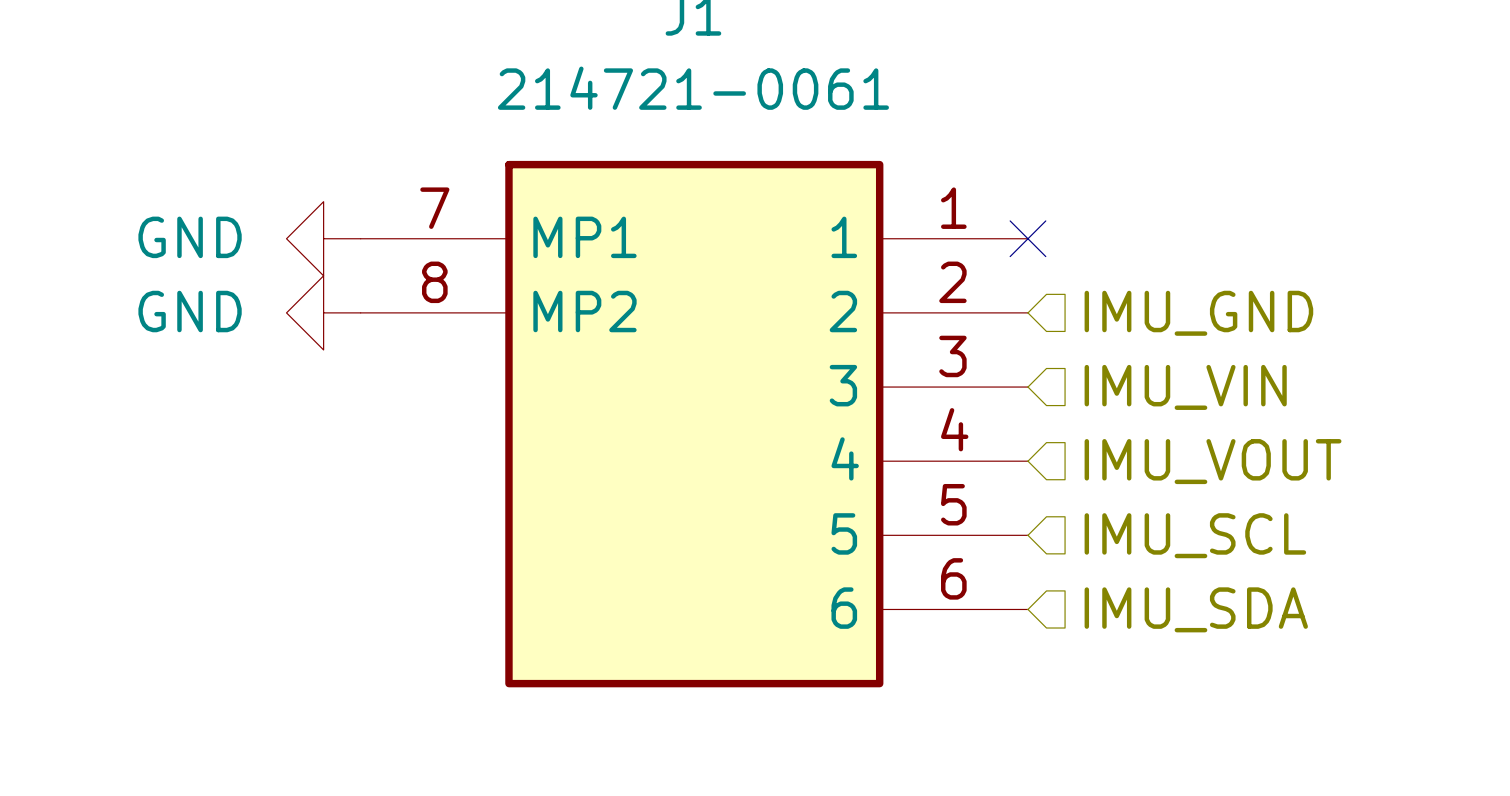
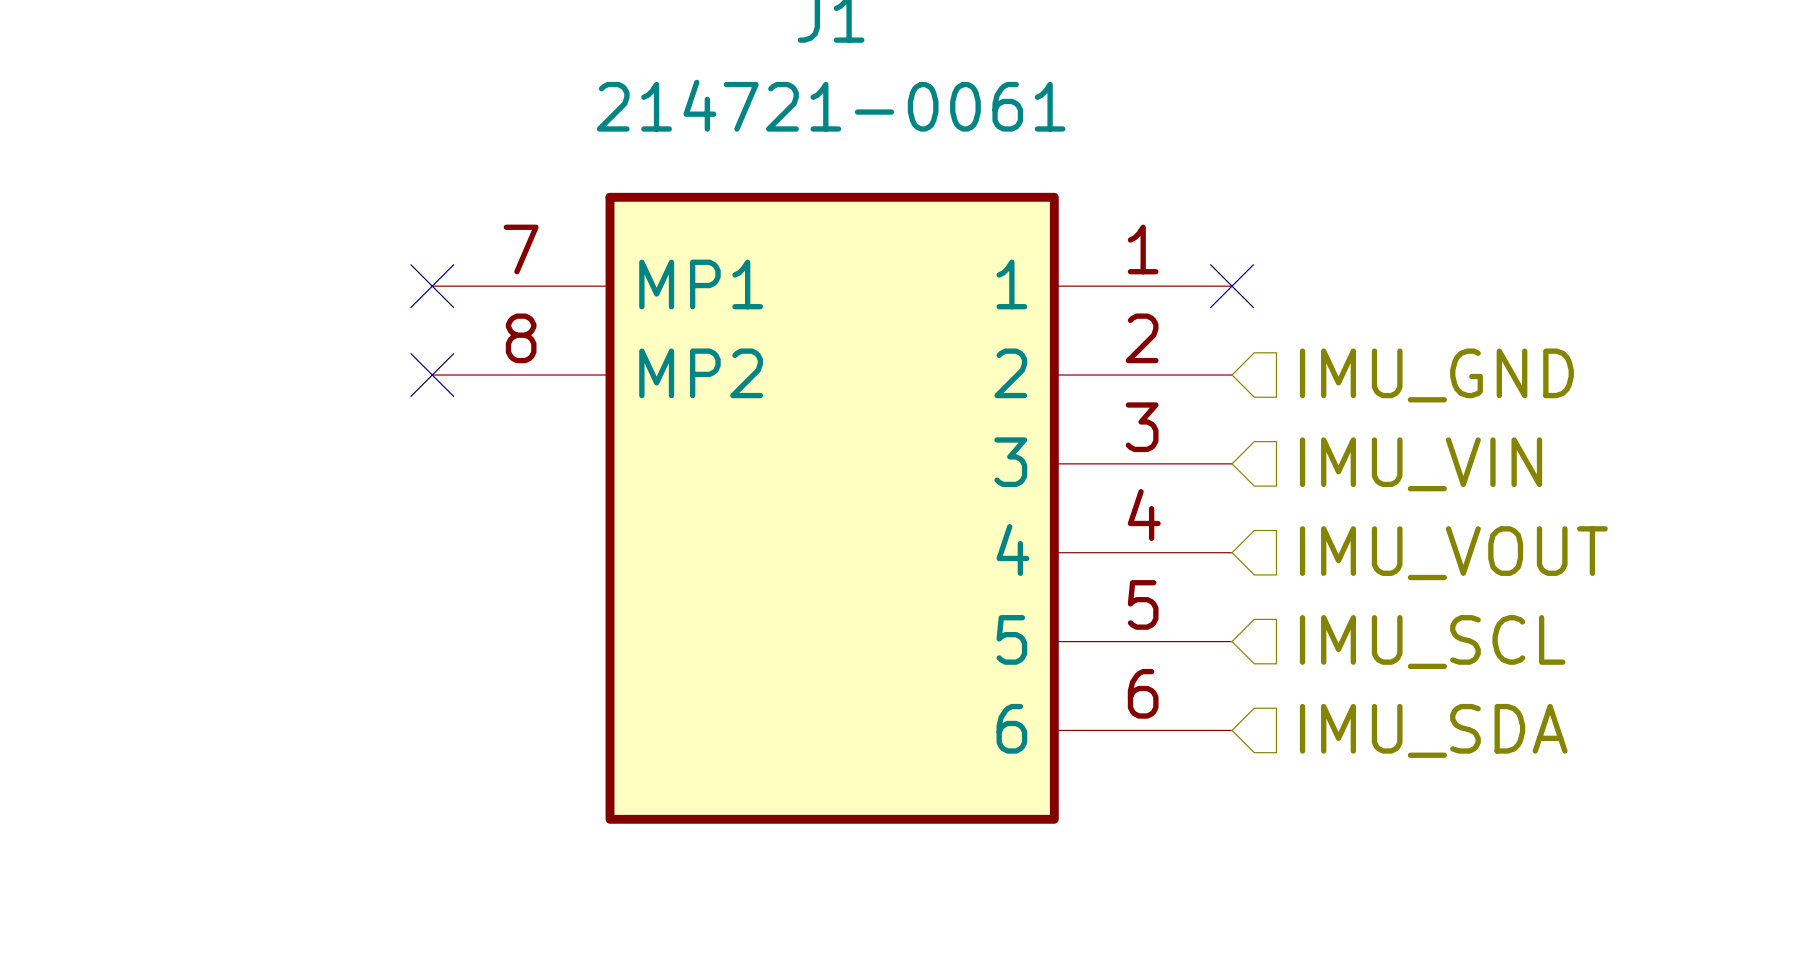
power symbol: GND (323, 238) -> none
no-connect mark: none -> (432, 286)
power symbol: GND (323, 312) -> none
no-connect mark: none -> (432, 375)

